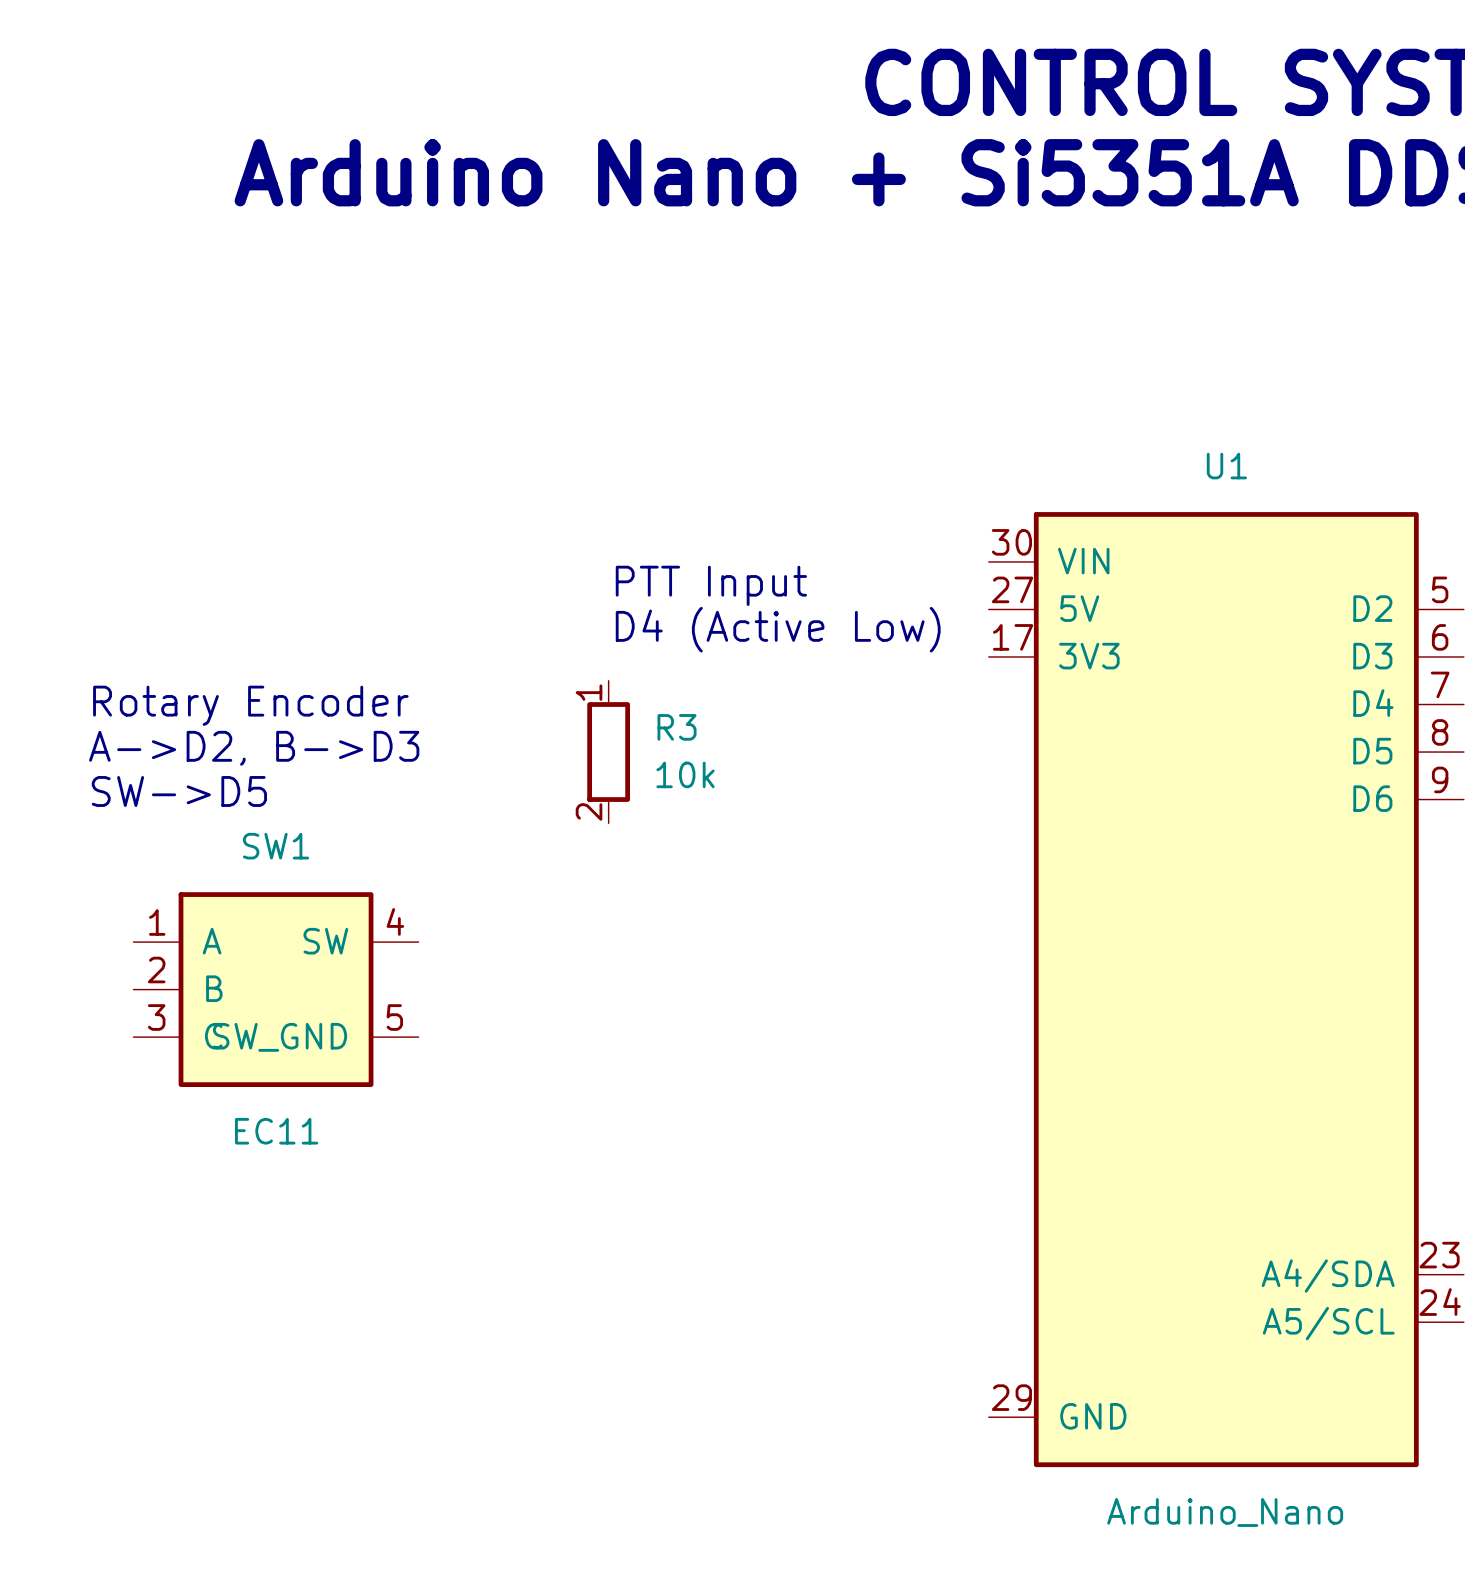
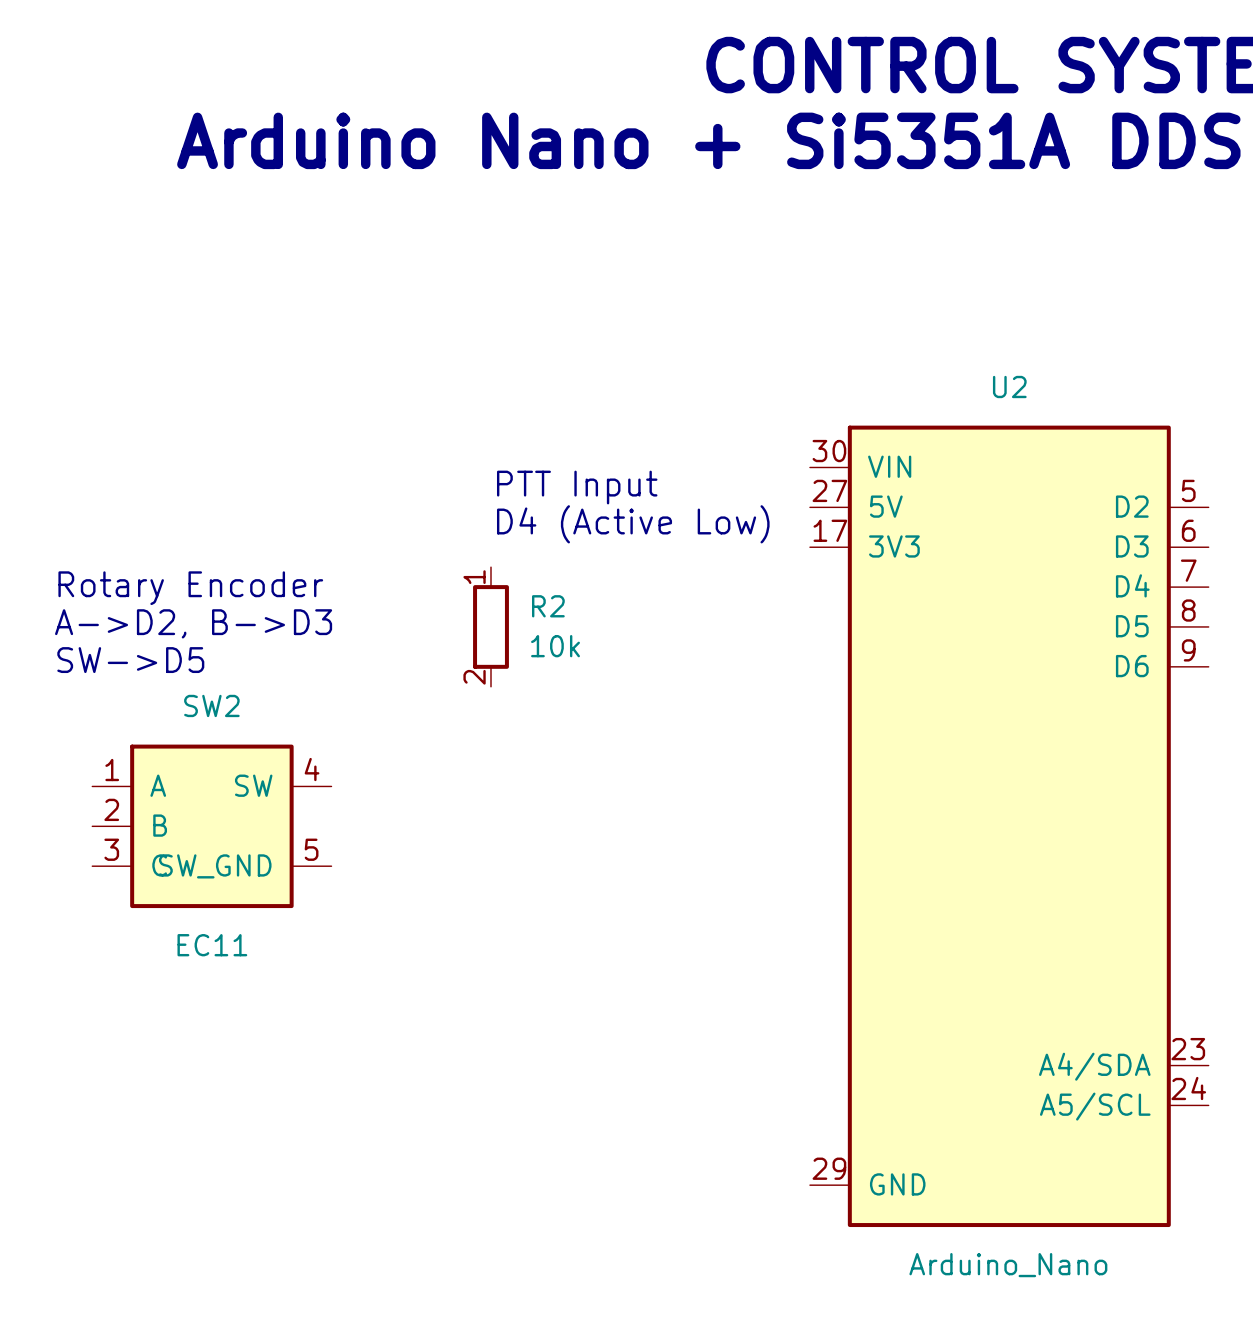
U1 name: U1 (1226, 466) -> U2 (1009, 386)
R3 name: R3 (677, 727) -> R2 (548, 606)
SW1 name: SW1 (276, 846) -> SW2 (211, 705)

